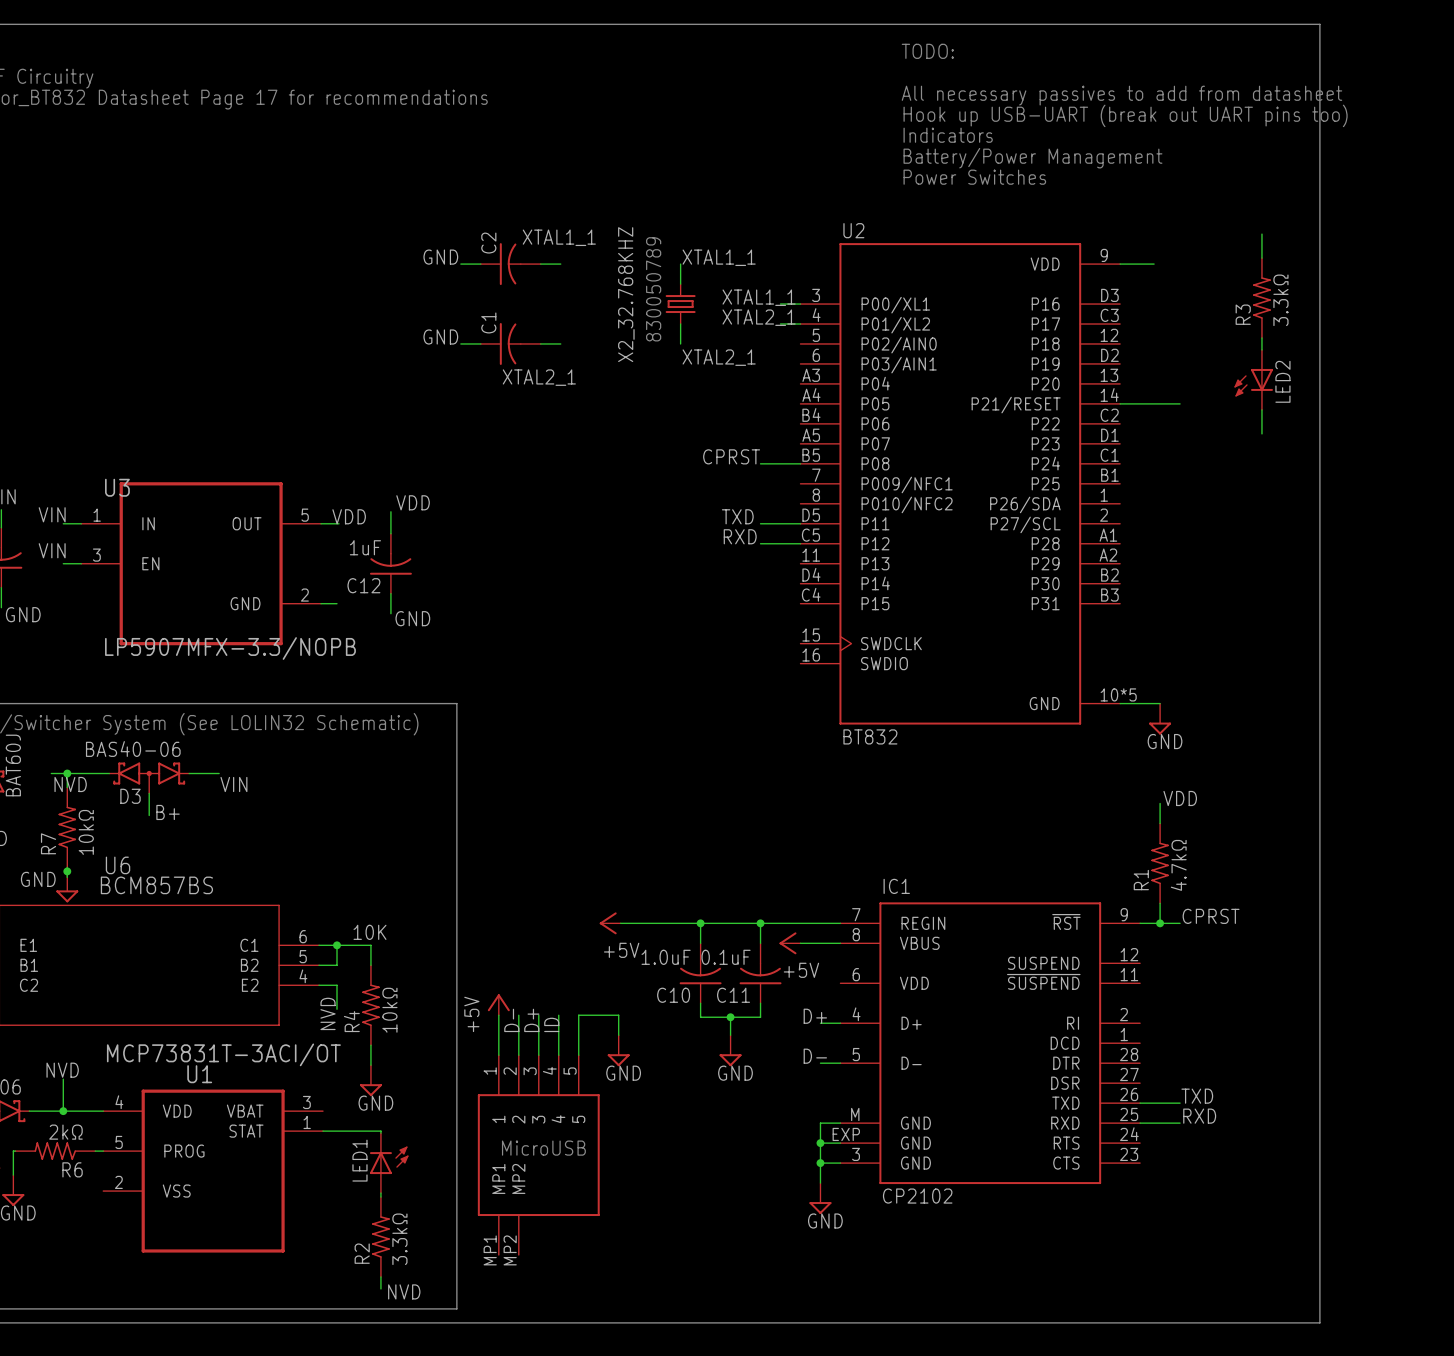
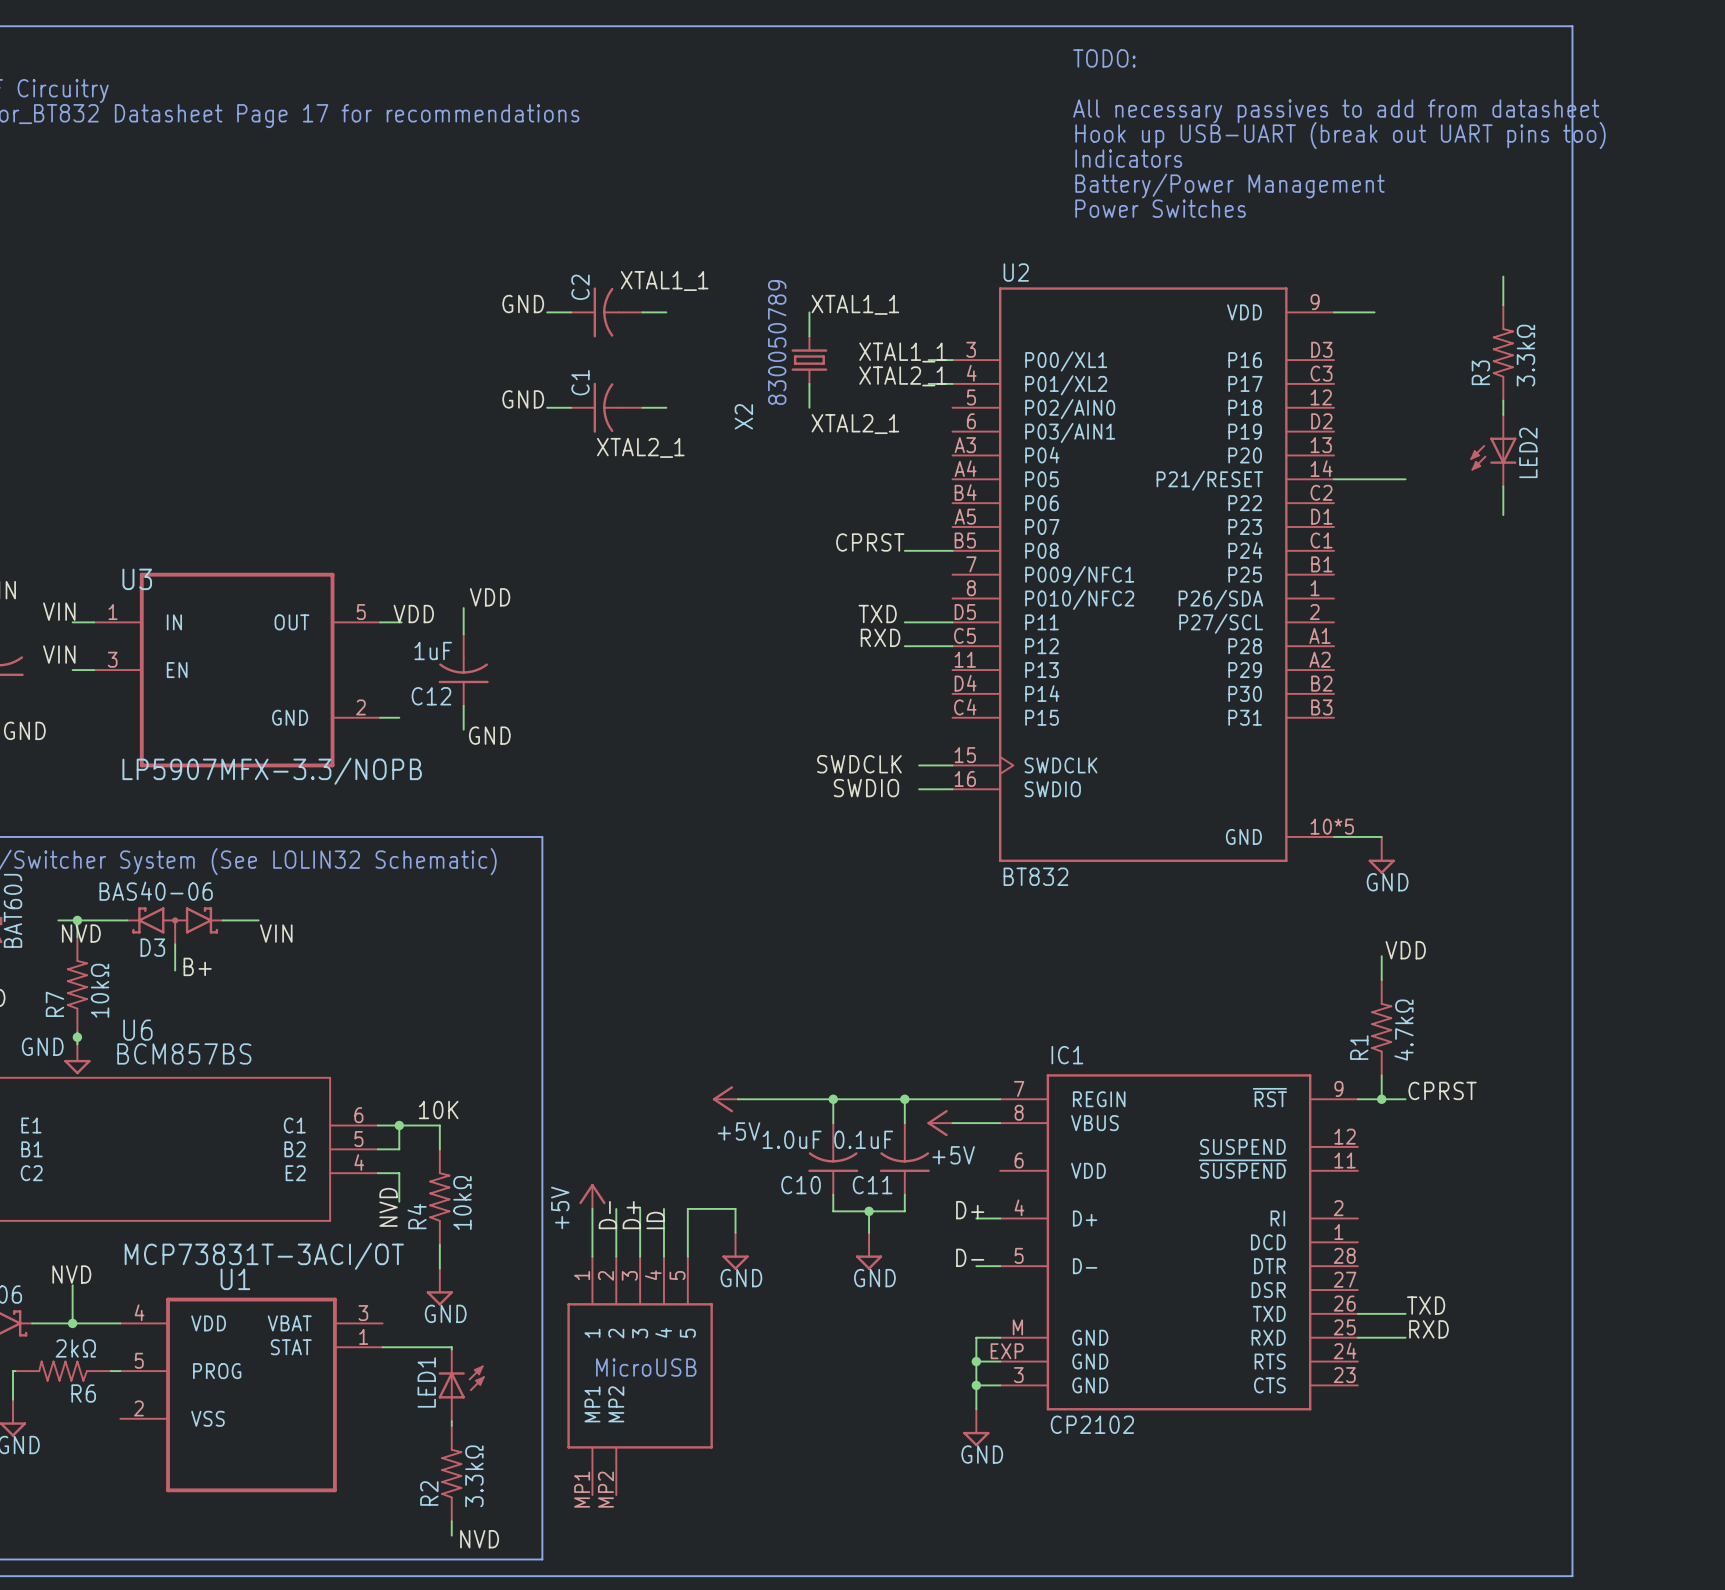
X2_32.768KHZ name: X2_32.768KHZ (626, 294) -> X2 (743, 416)
label: none -> SWDCLK (859, 764)
wire: none -> (919, 765) (952, 765)
label: none -> SWDIO (866, 788)
wire: none -> (919, 789) (952, 789)

